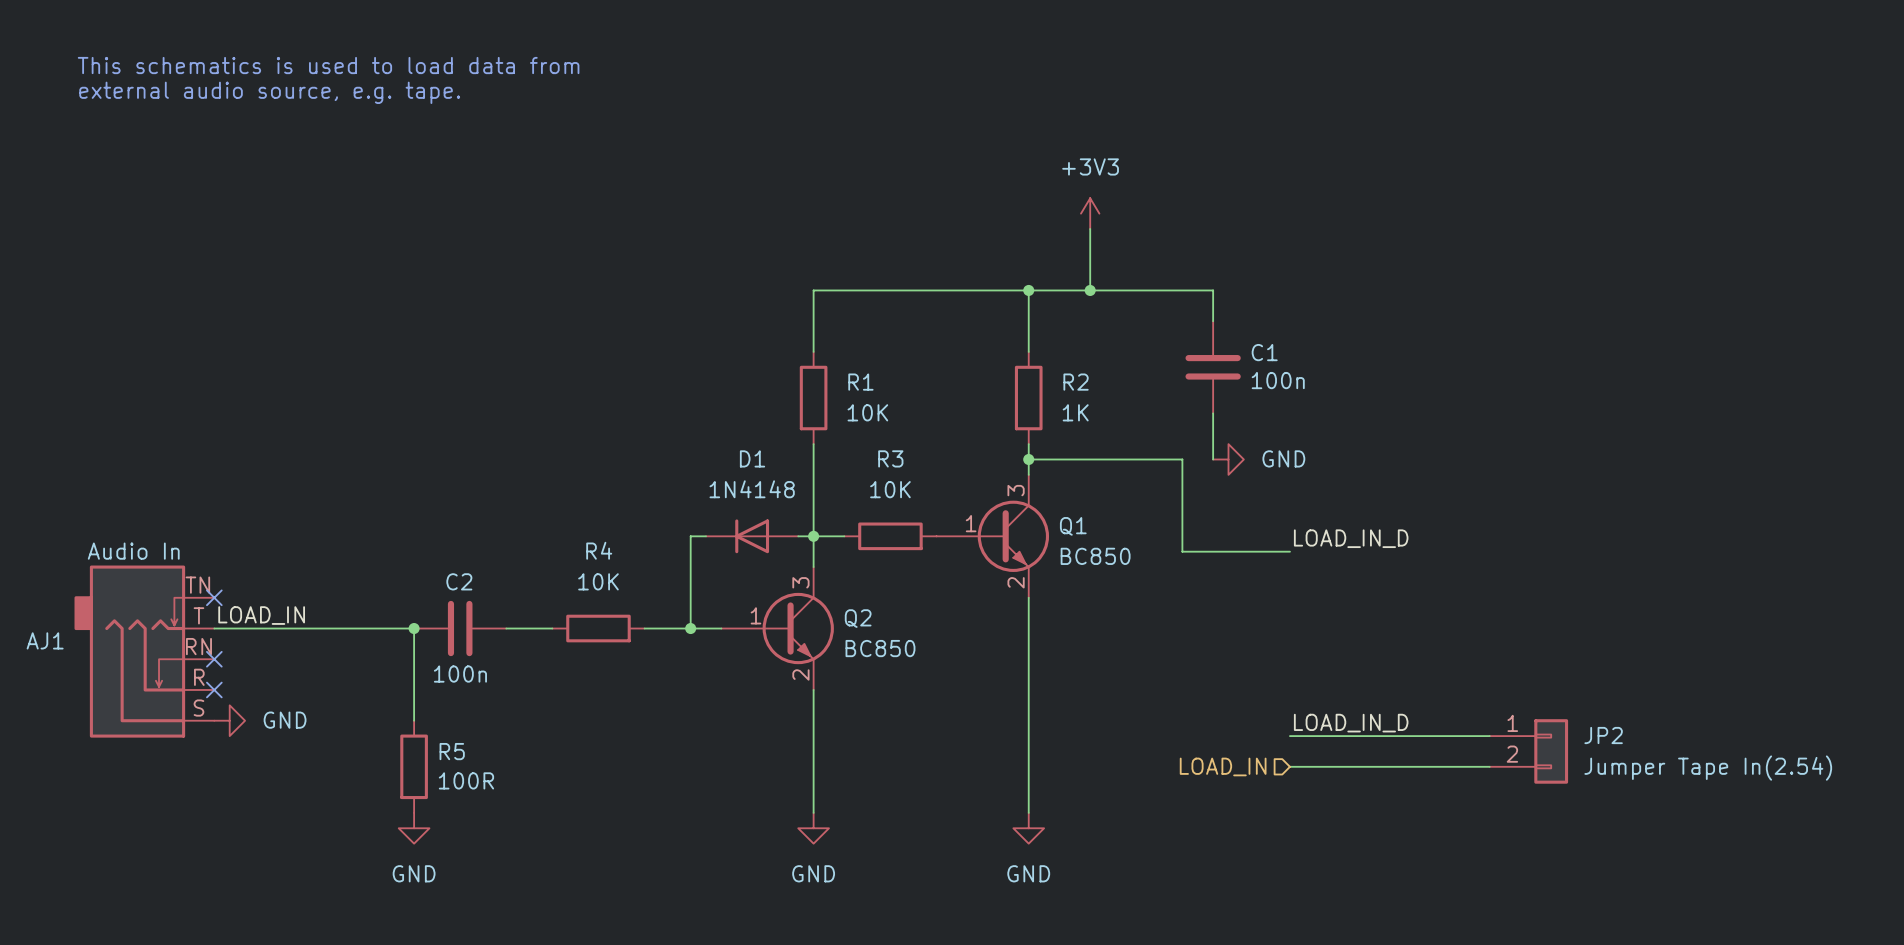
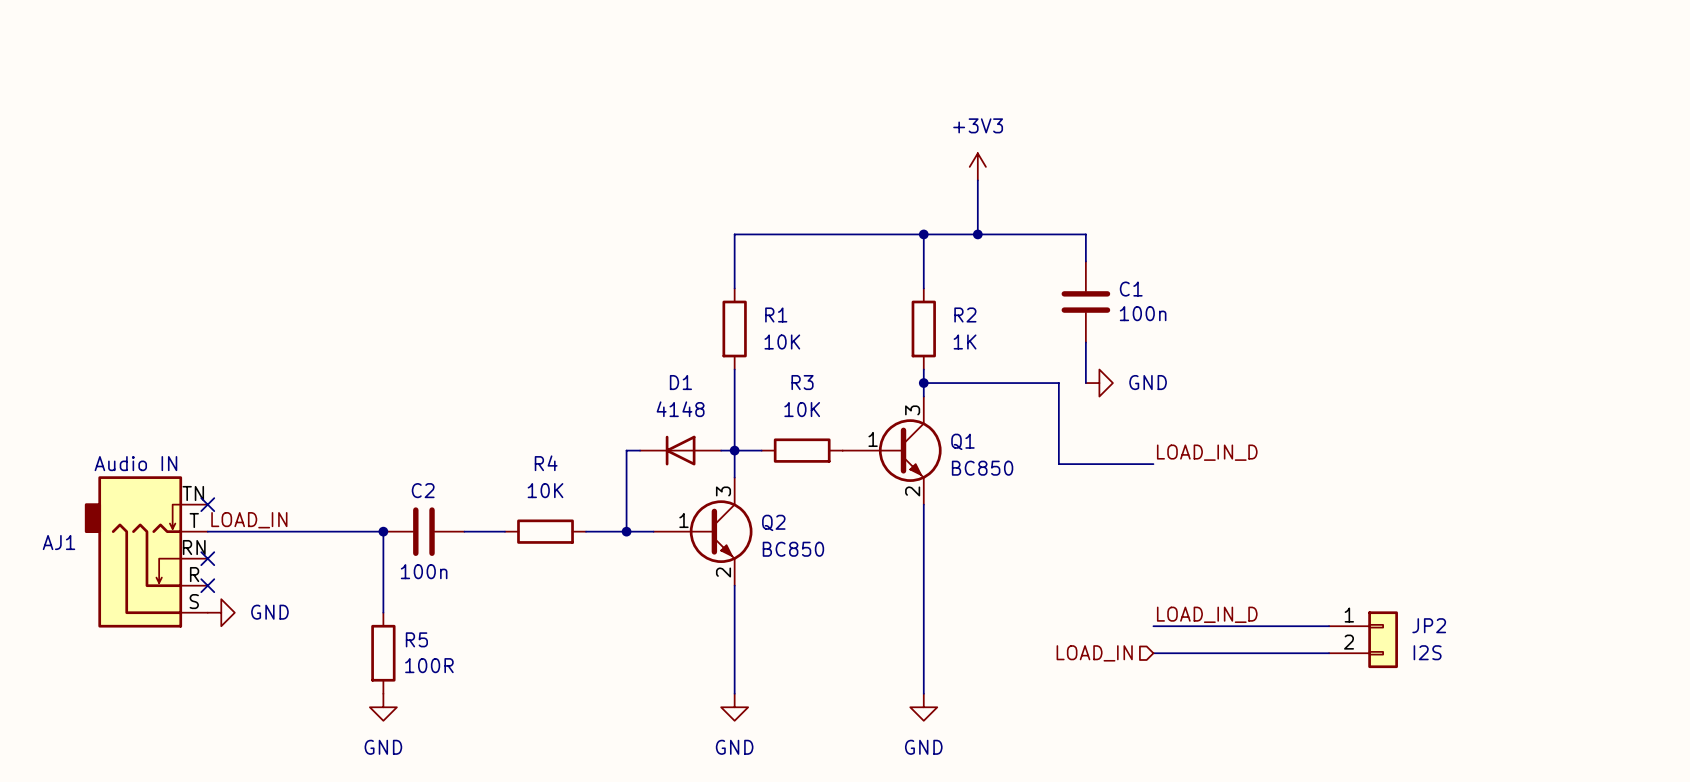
text: This schematics is used to load data from (328, 65) -> none
text: external audio source, e.g. tape. (269, 92) -> none
D1 value: 1N4148 (752, 489) -> 4148 (680, 409)
AJ1 value: Audio In (133, 551) -> Audio IN (135, 463)
JP2 value: Jumper Tape In(2.54) (1708, 768) -> I2S (1427, 652)

